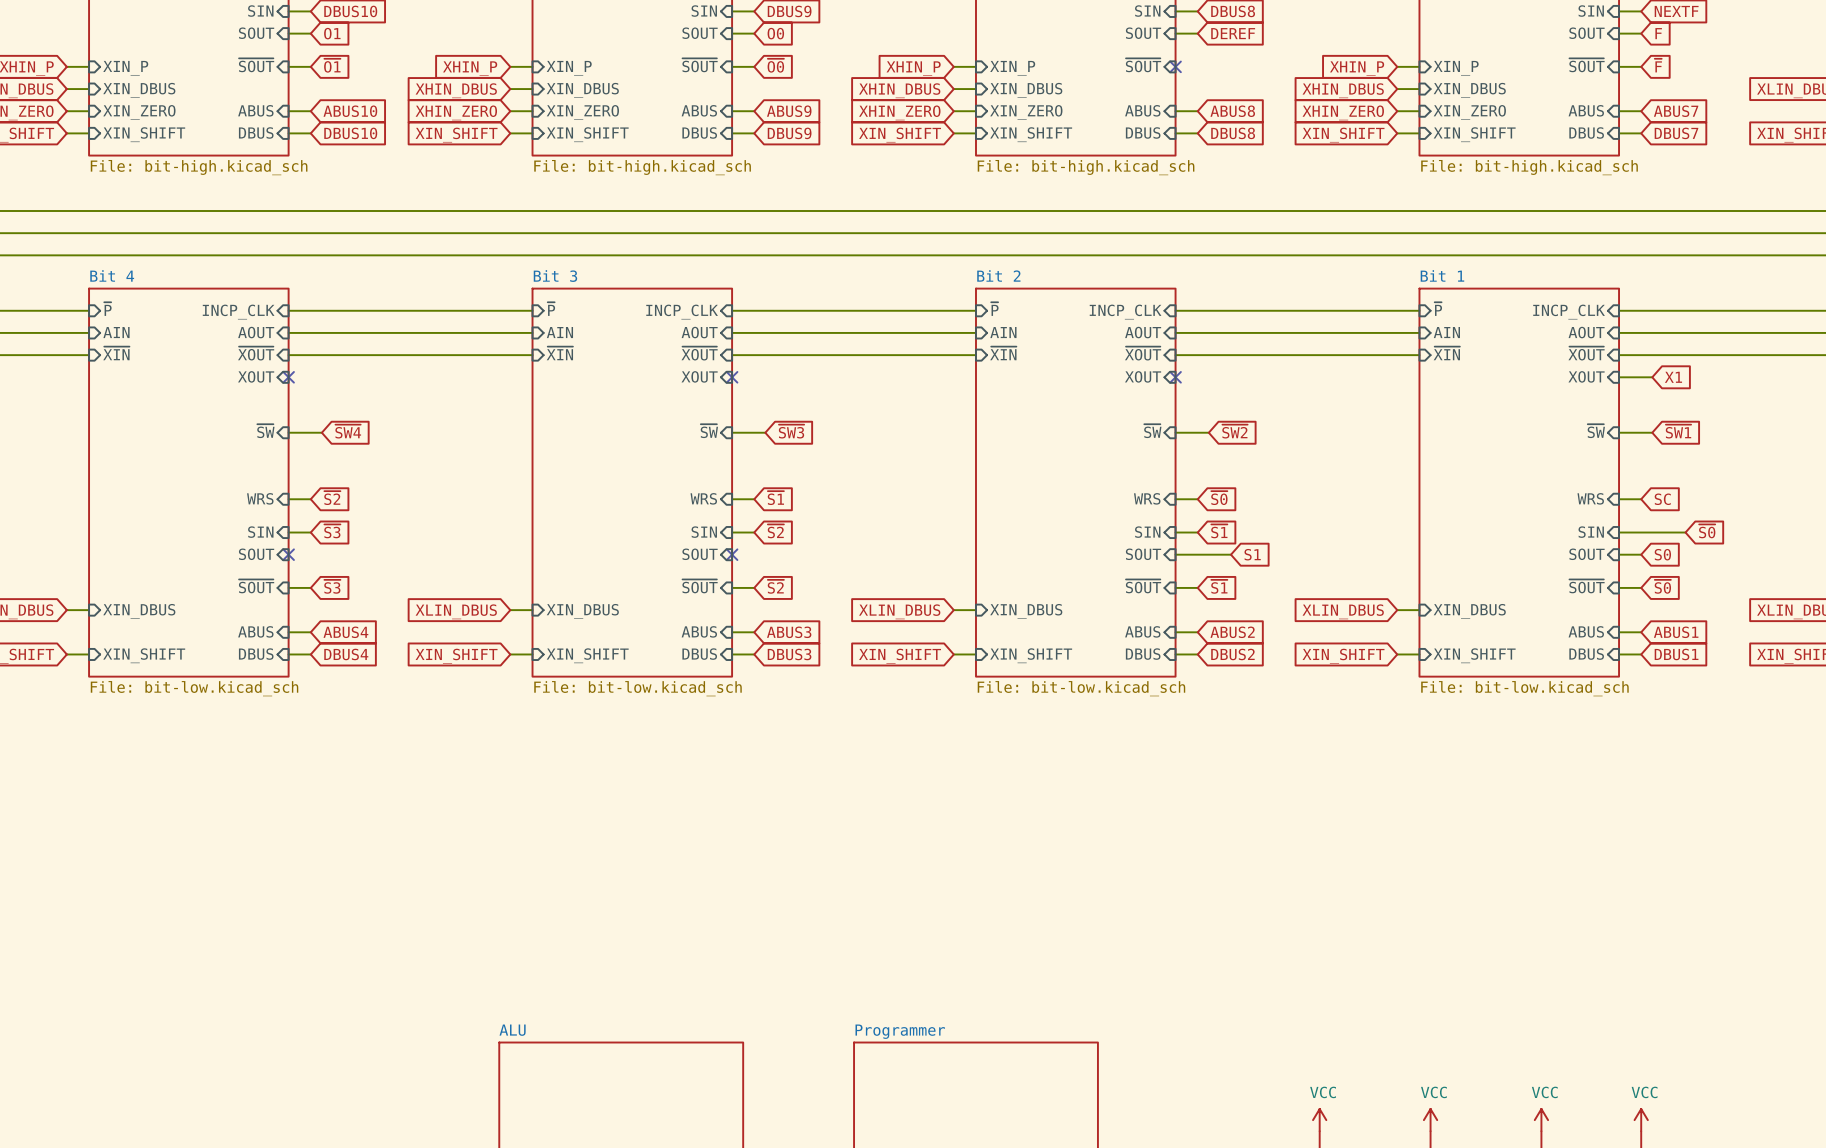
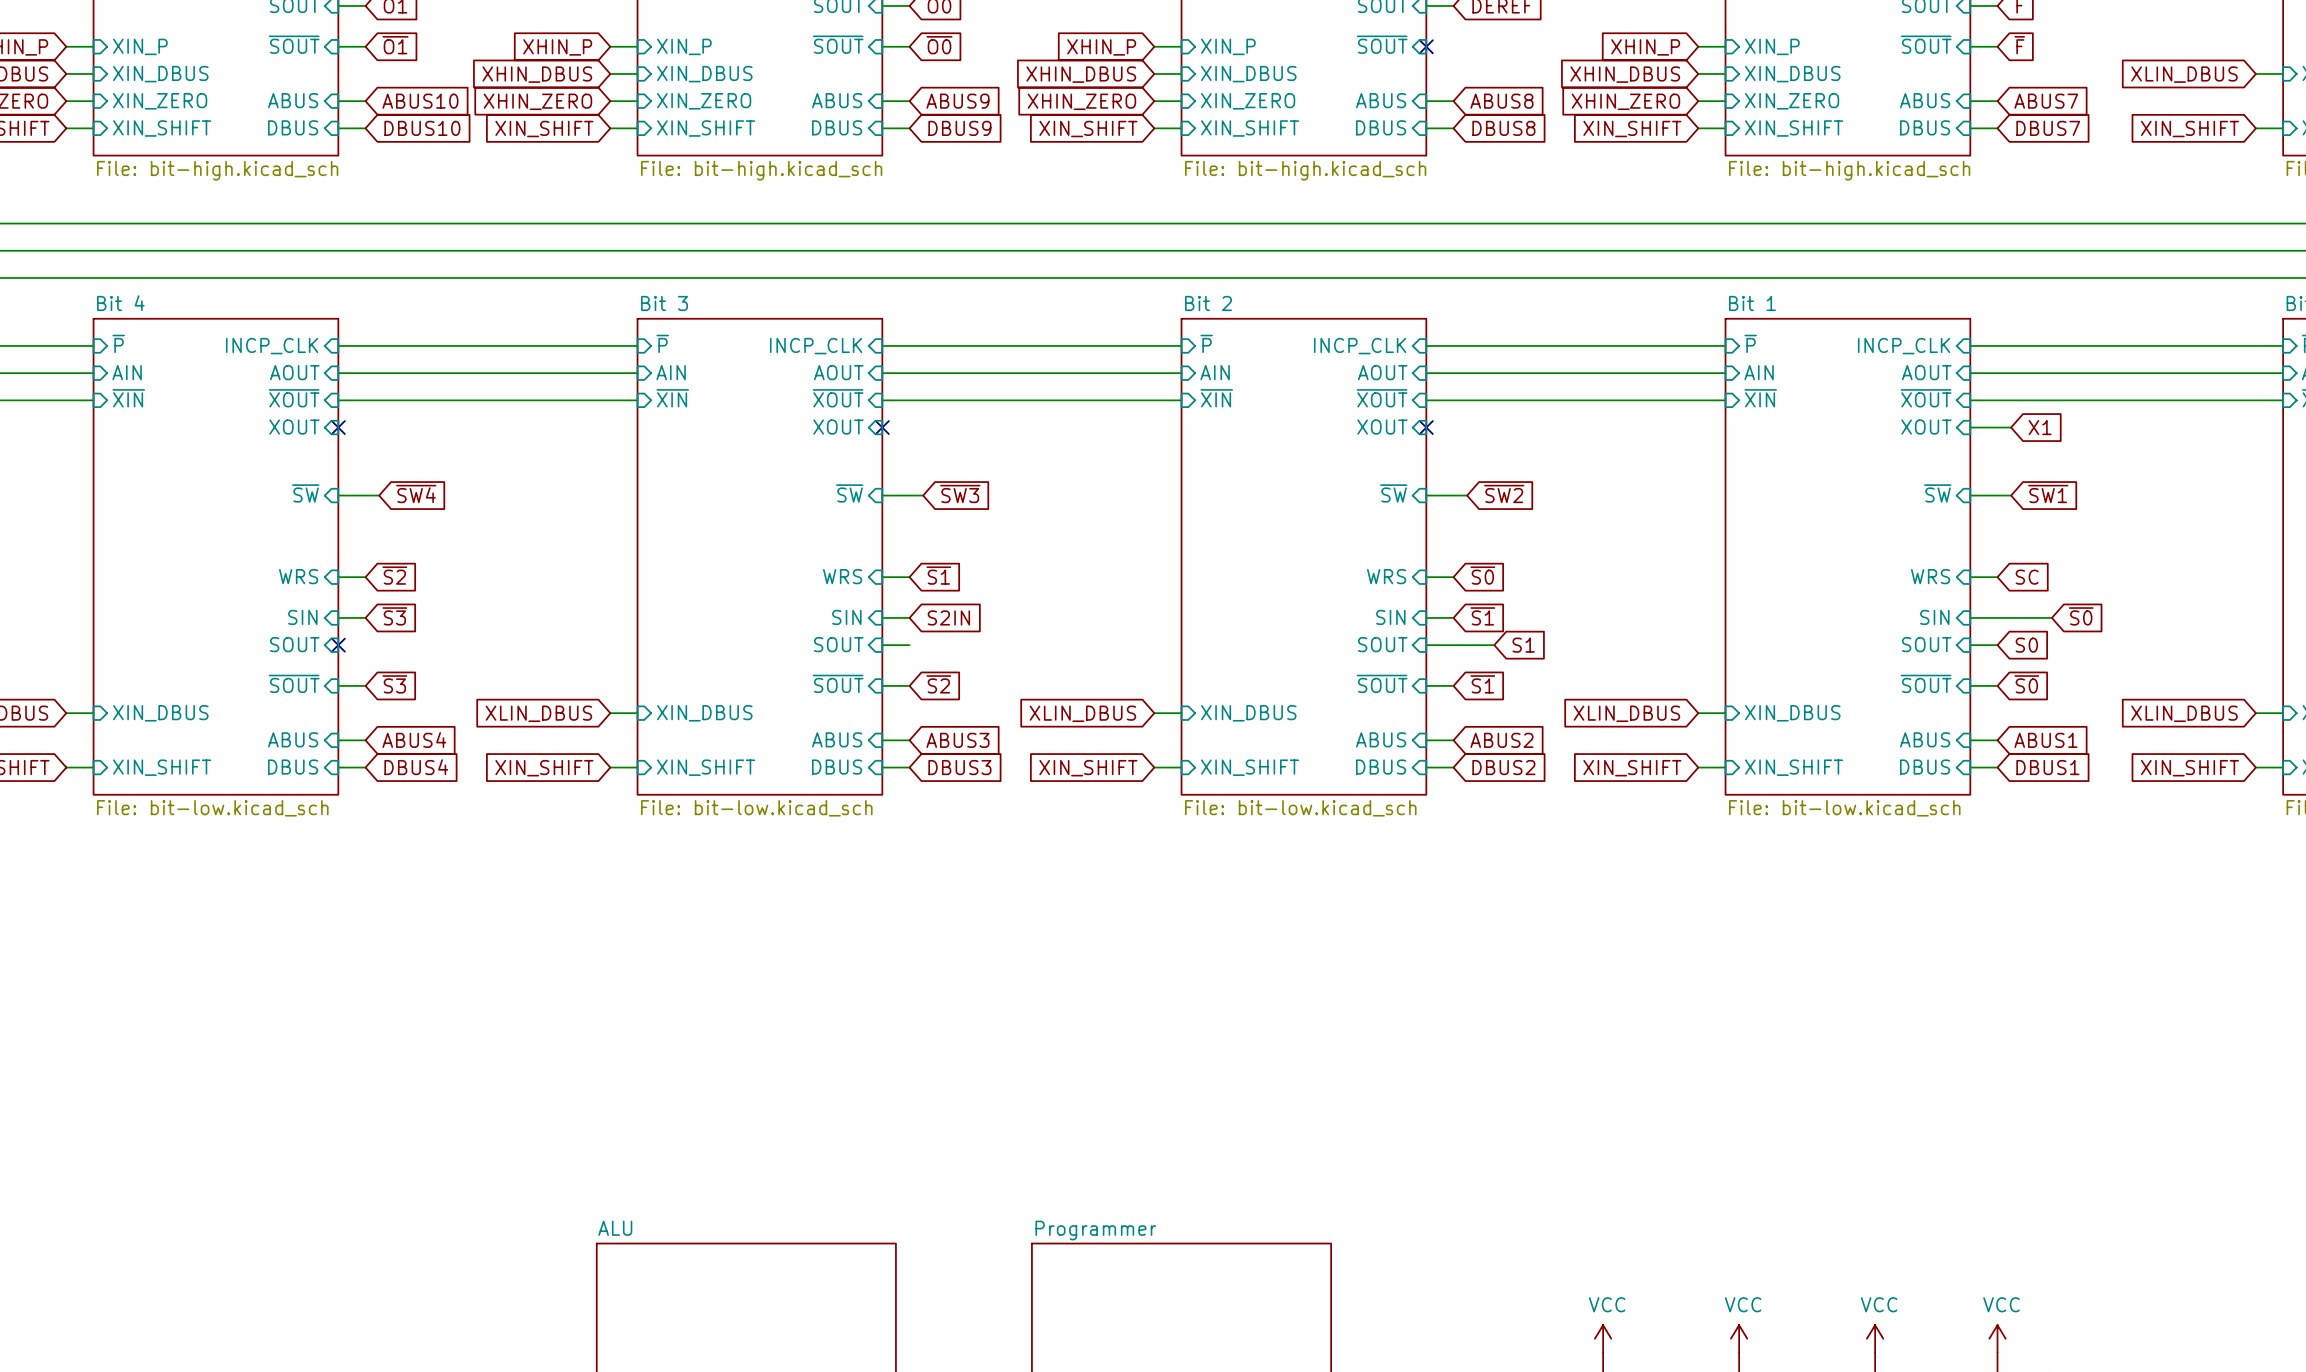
global label: ~{S2} (775, 531) -> S2IN (948, 617)
wire: none -> (882, 645) (909, 645)
no-connect mark: (732, 554) -> none

